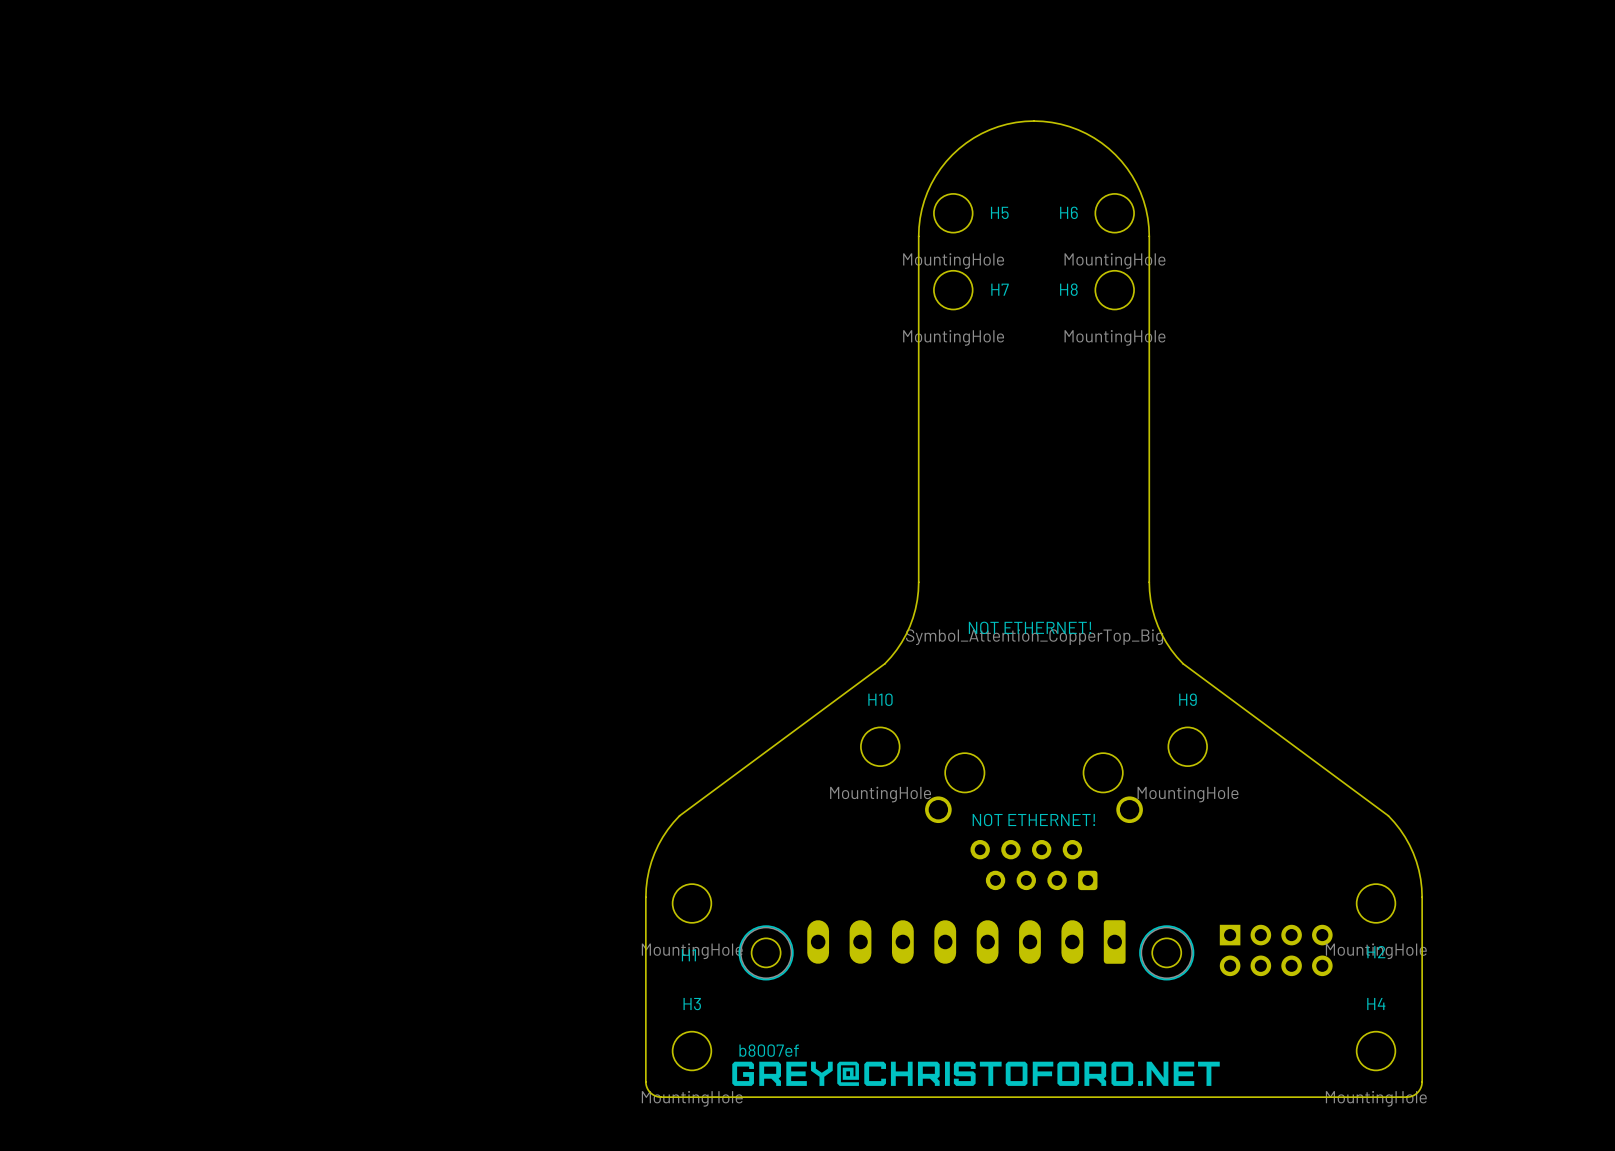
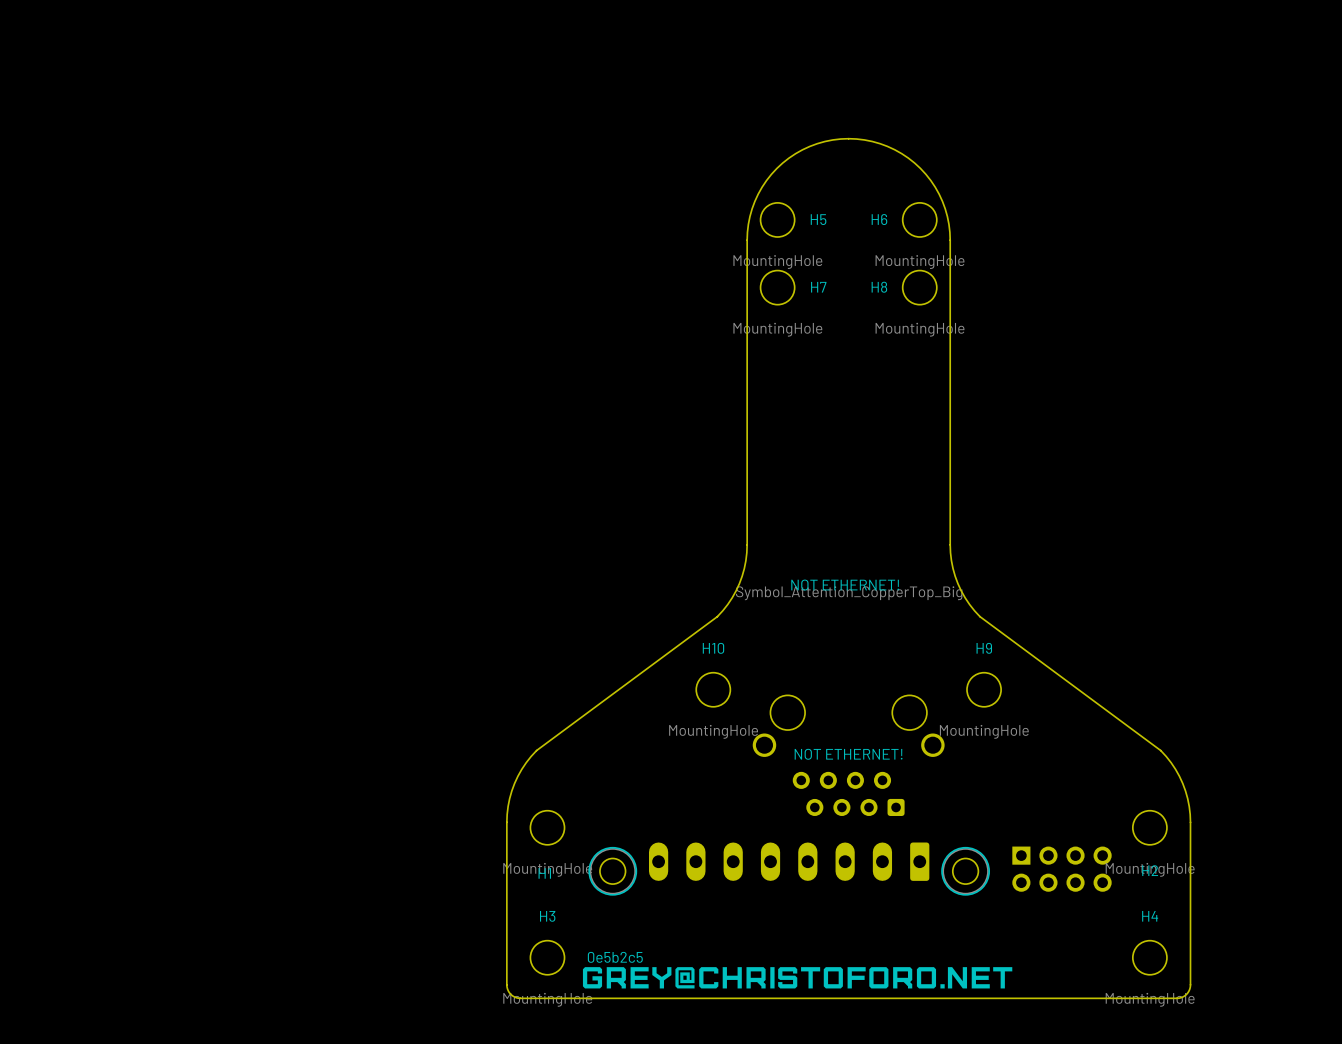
text: b8007ef (769, 1050) -> 0e5b2c5 (615, 957)

